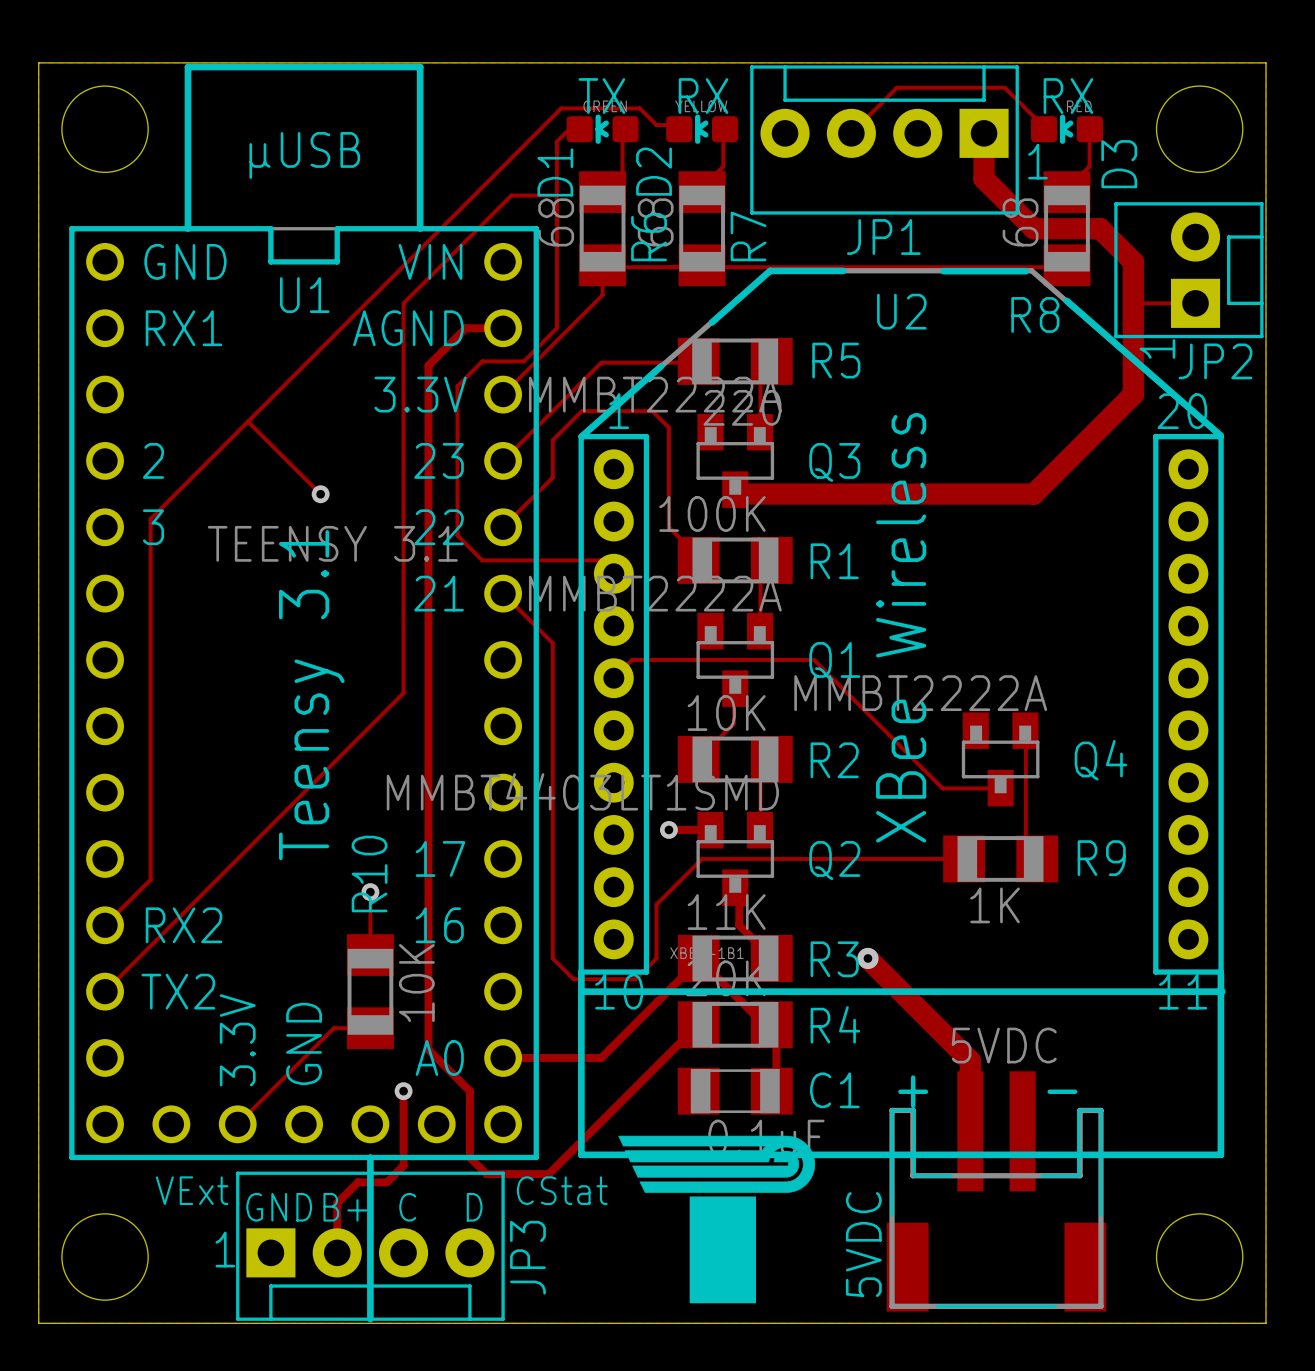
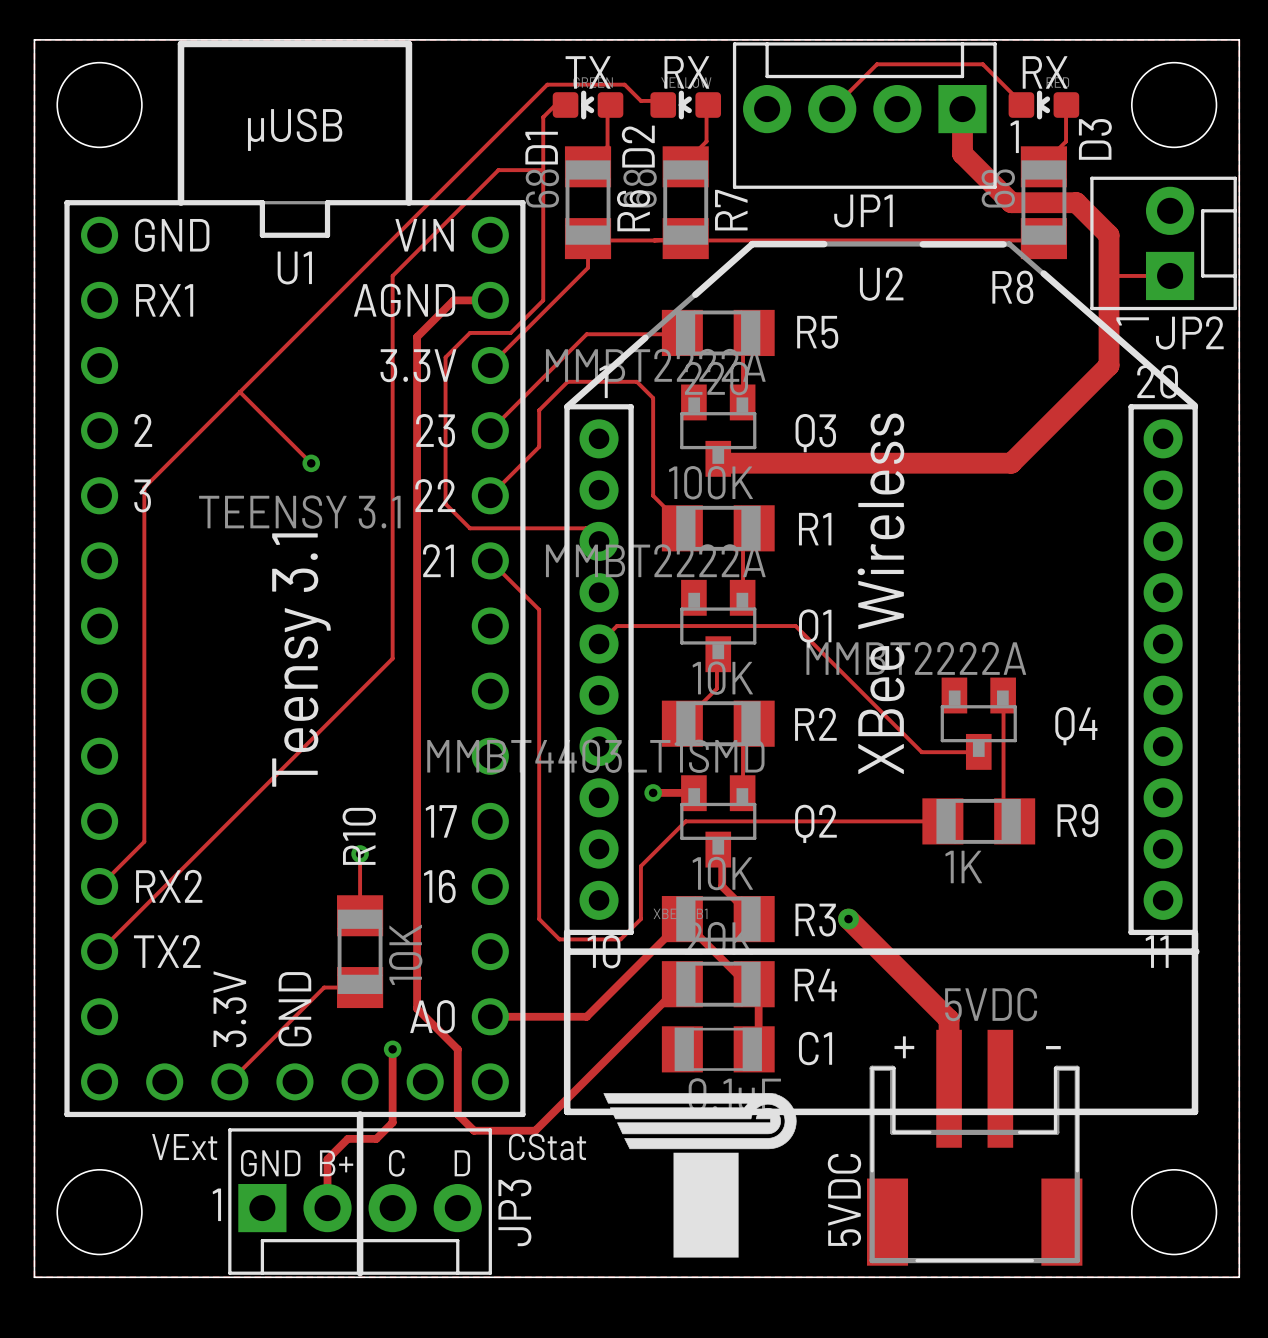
R3 value: 11K (726, 912) -> 10K (722, 873)

